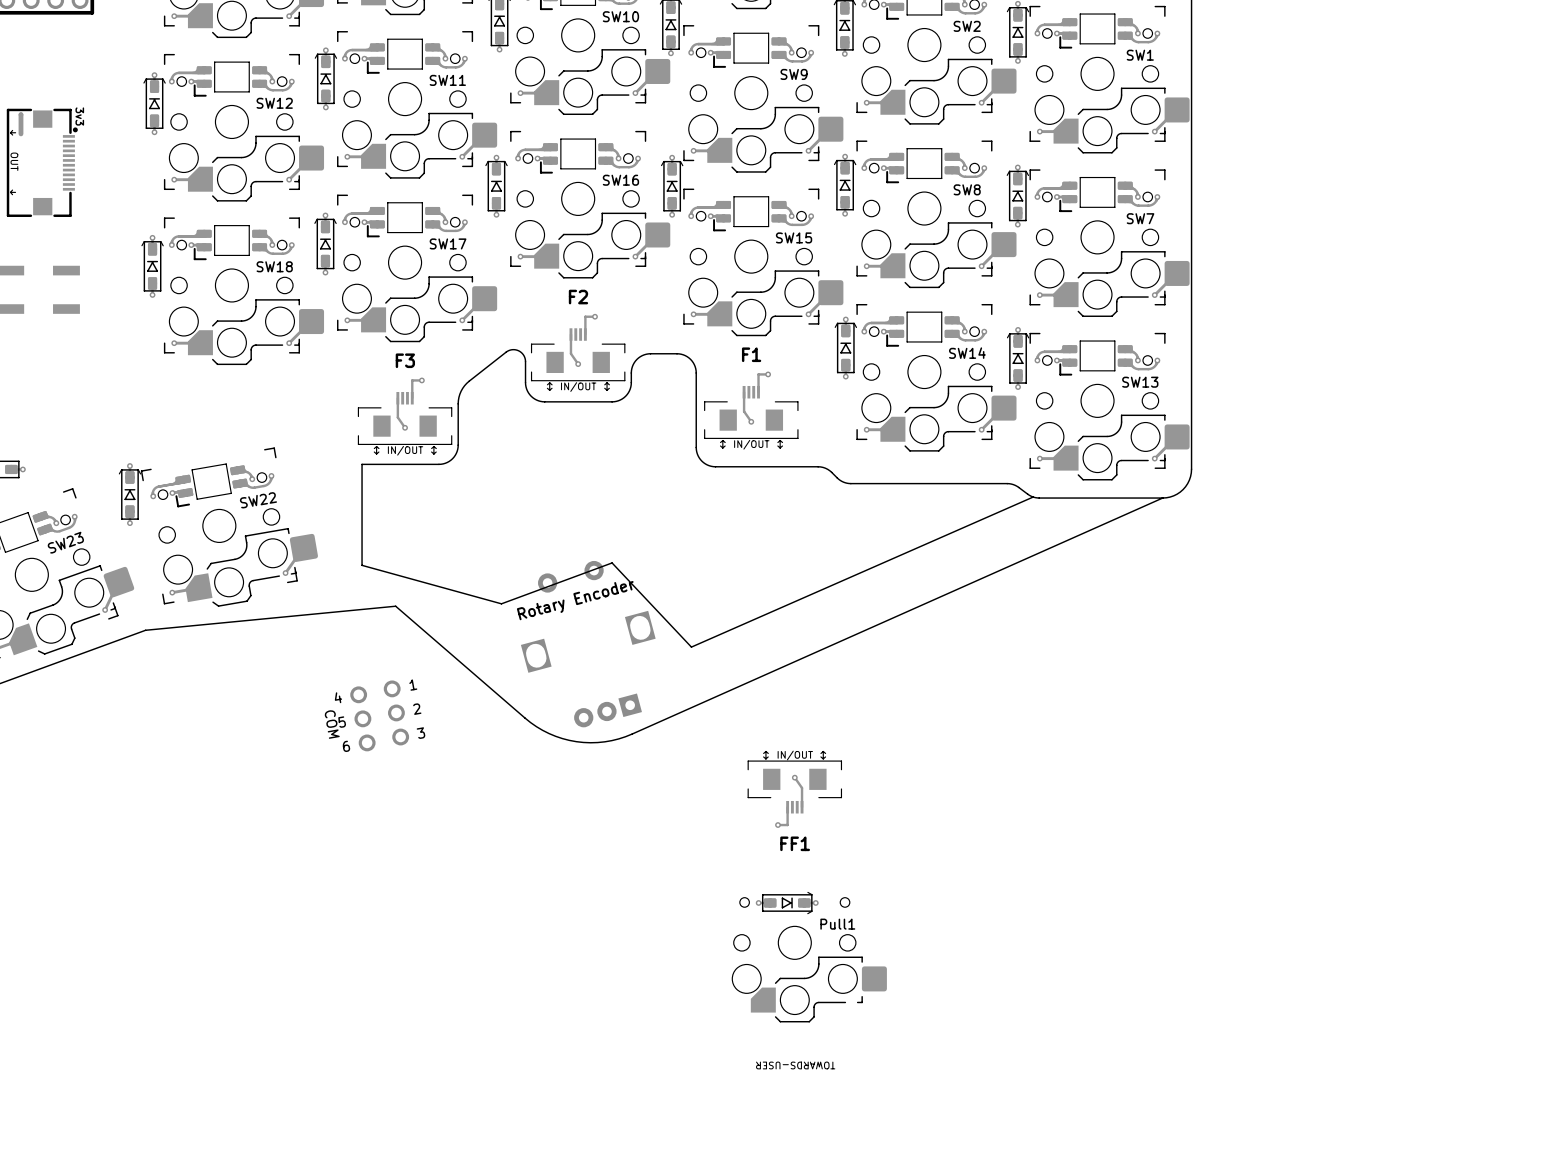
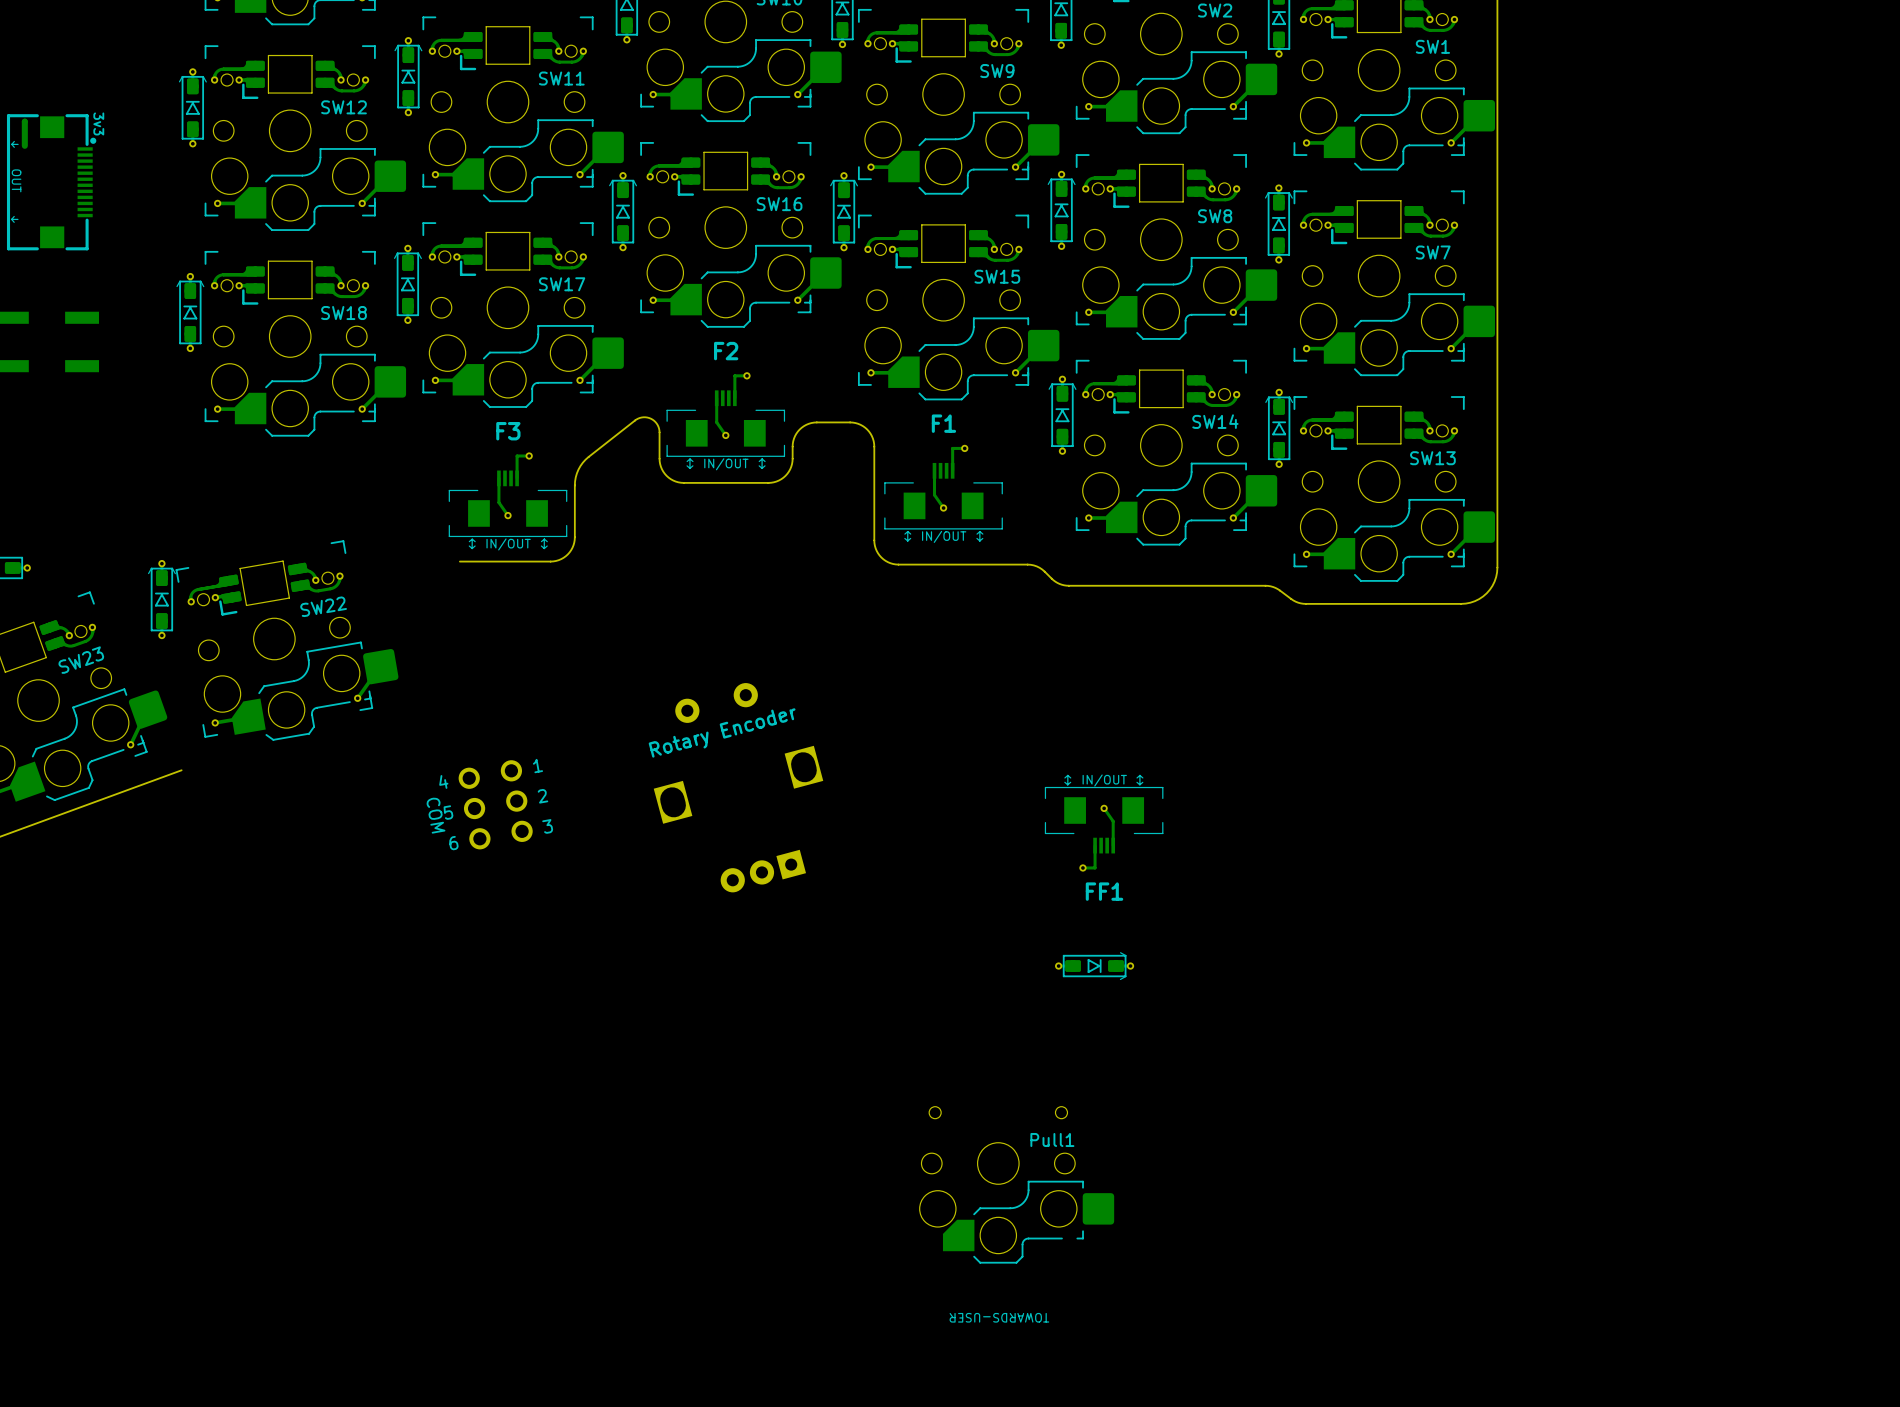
board edge: (366, 464) (362, 464) (362, 565) (501, 603) (612, 562) (691, 647) (1033, 497) -> none
board edge: (1162, 498) (632, 734) (604, 741) (583, 742) (569, 740) (549, 733) (536, 726) (395, 606) (145, 630) -> none
part position: (379, 715) -> (495, 804)
FF1 position: (794, 789) -> (1104, 823)
part position: (787, 903) -> (1094, 966)

